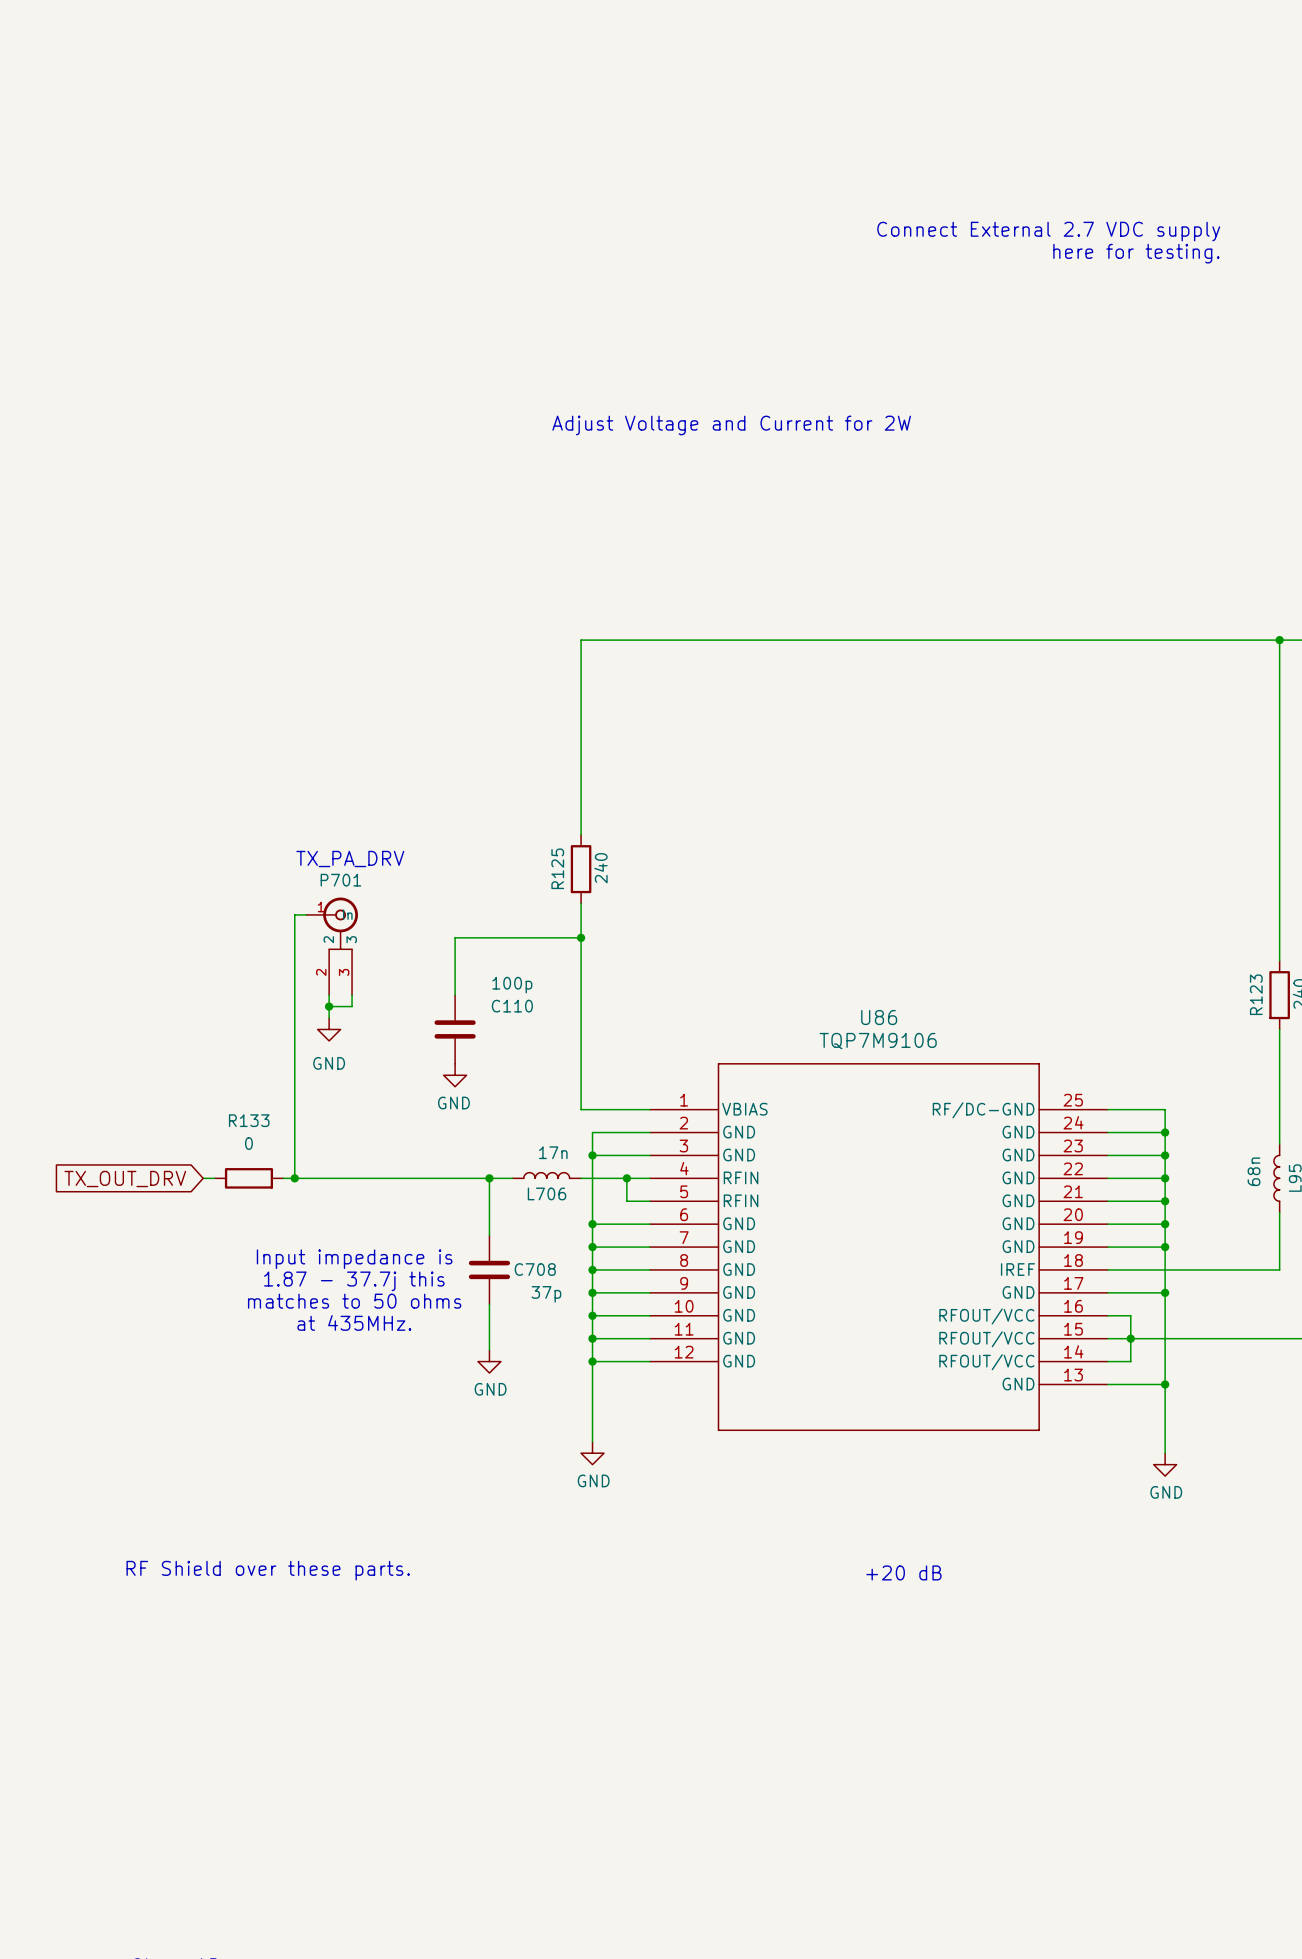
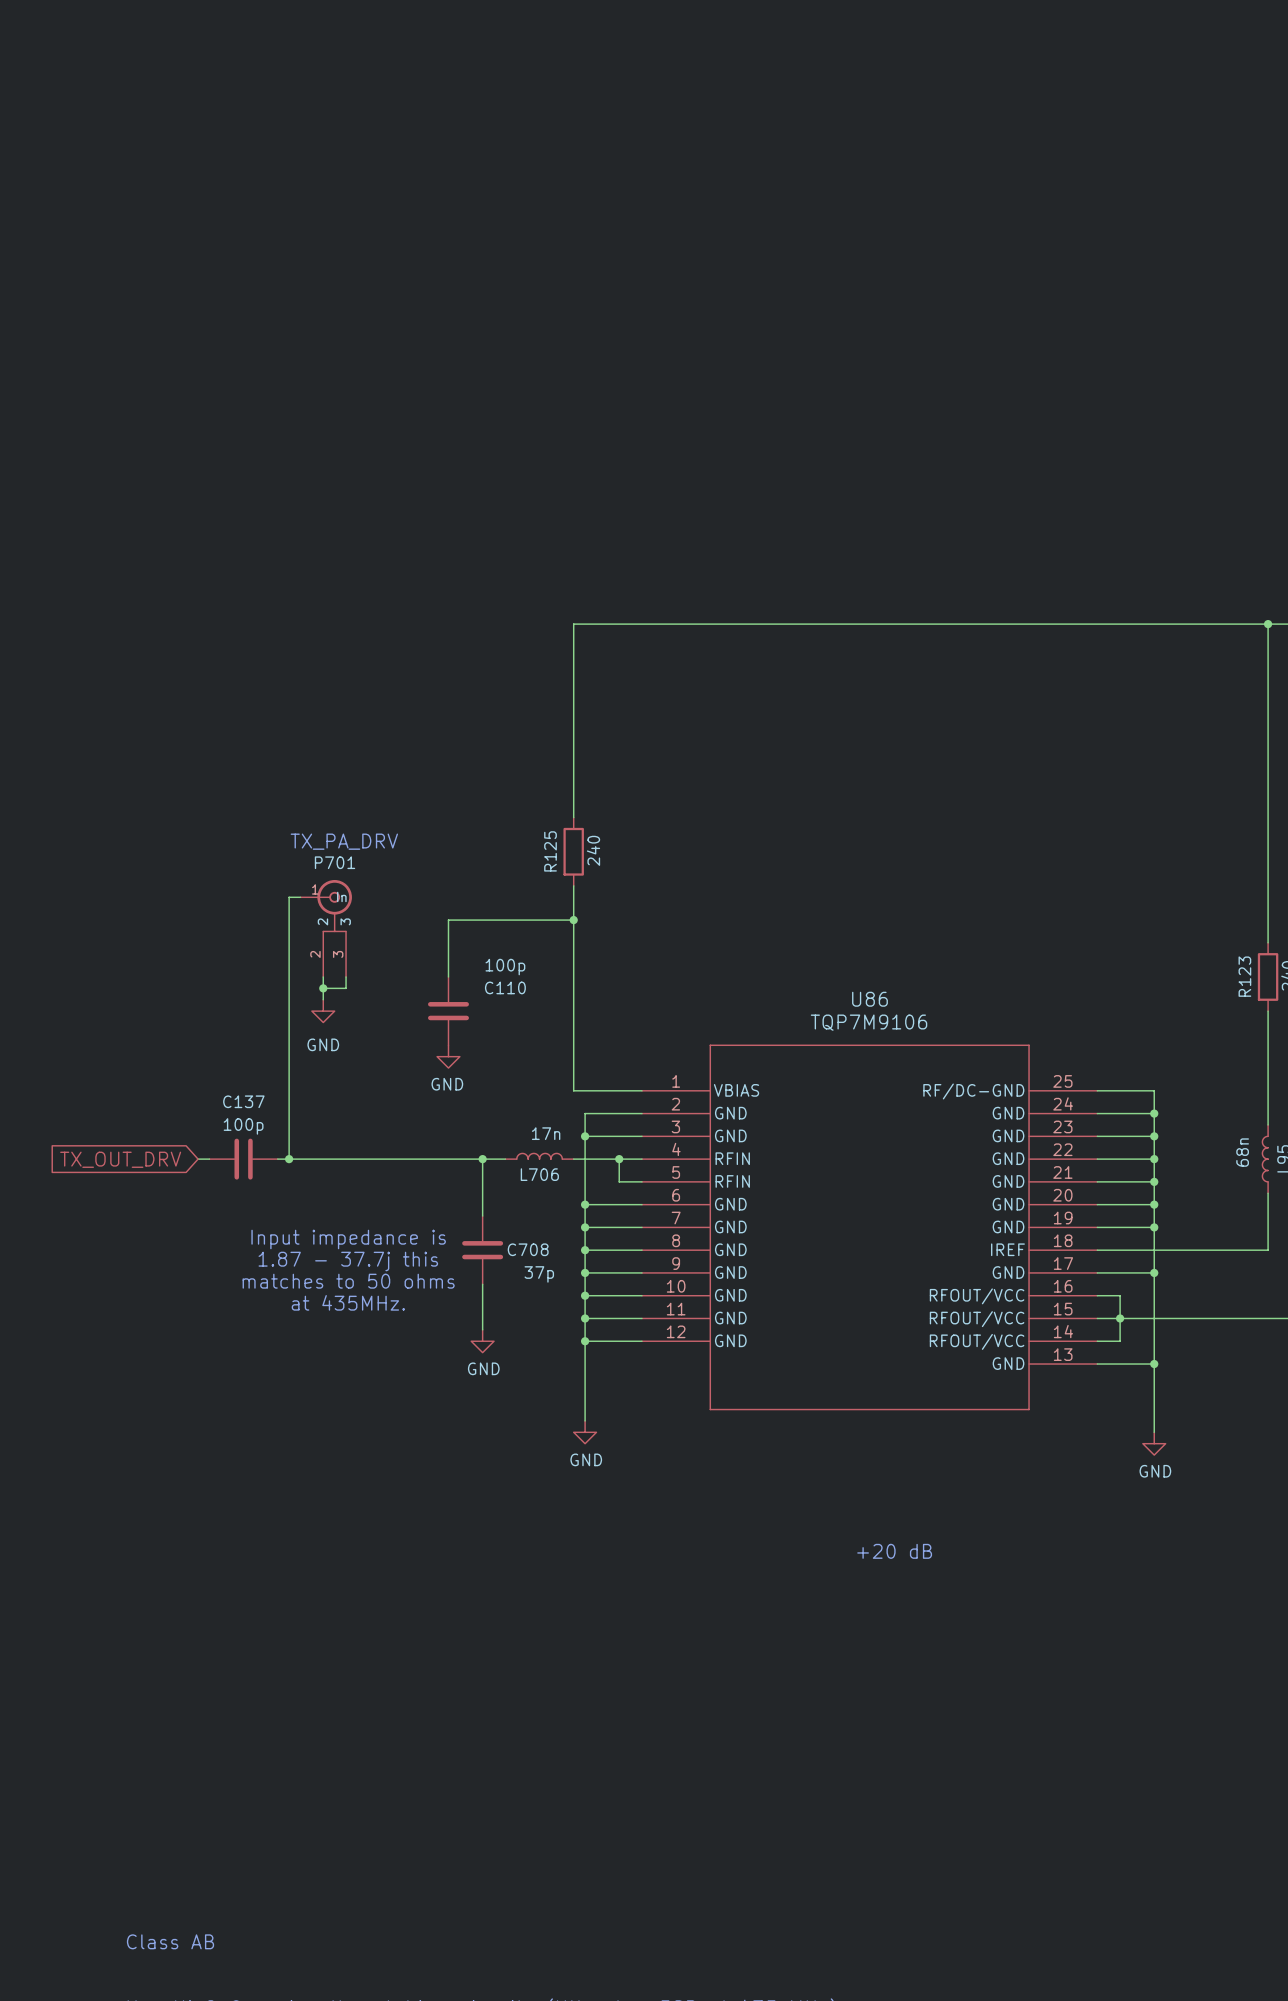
text: Connect External 2.7 VDC supply (1048, 231) -> none
text: here for testing. (1136, 253) -> none
text: Adjust Voltage and Current for 2W (731, 425) -> none
R133: 0 (248, 1178) -> none
C137: none -> 100p (243, 1159)
text: RF Shield over these parts. (268, 1570) -> none

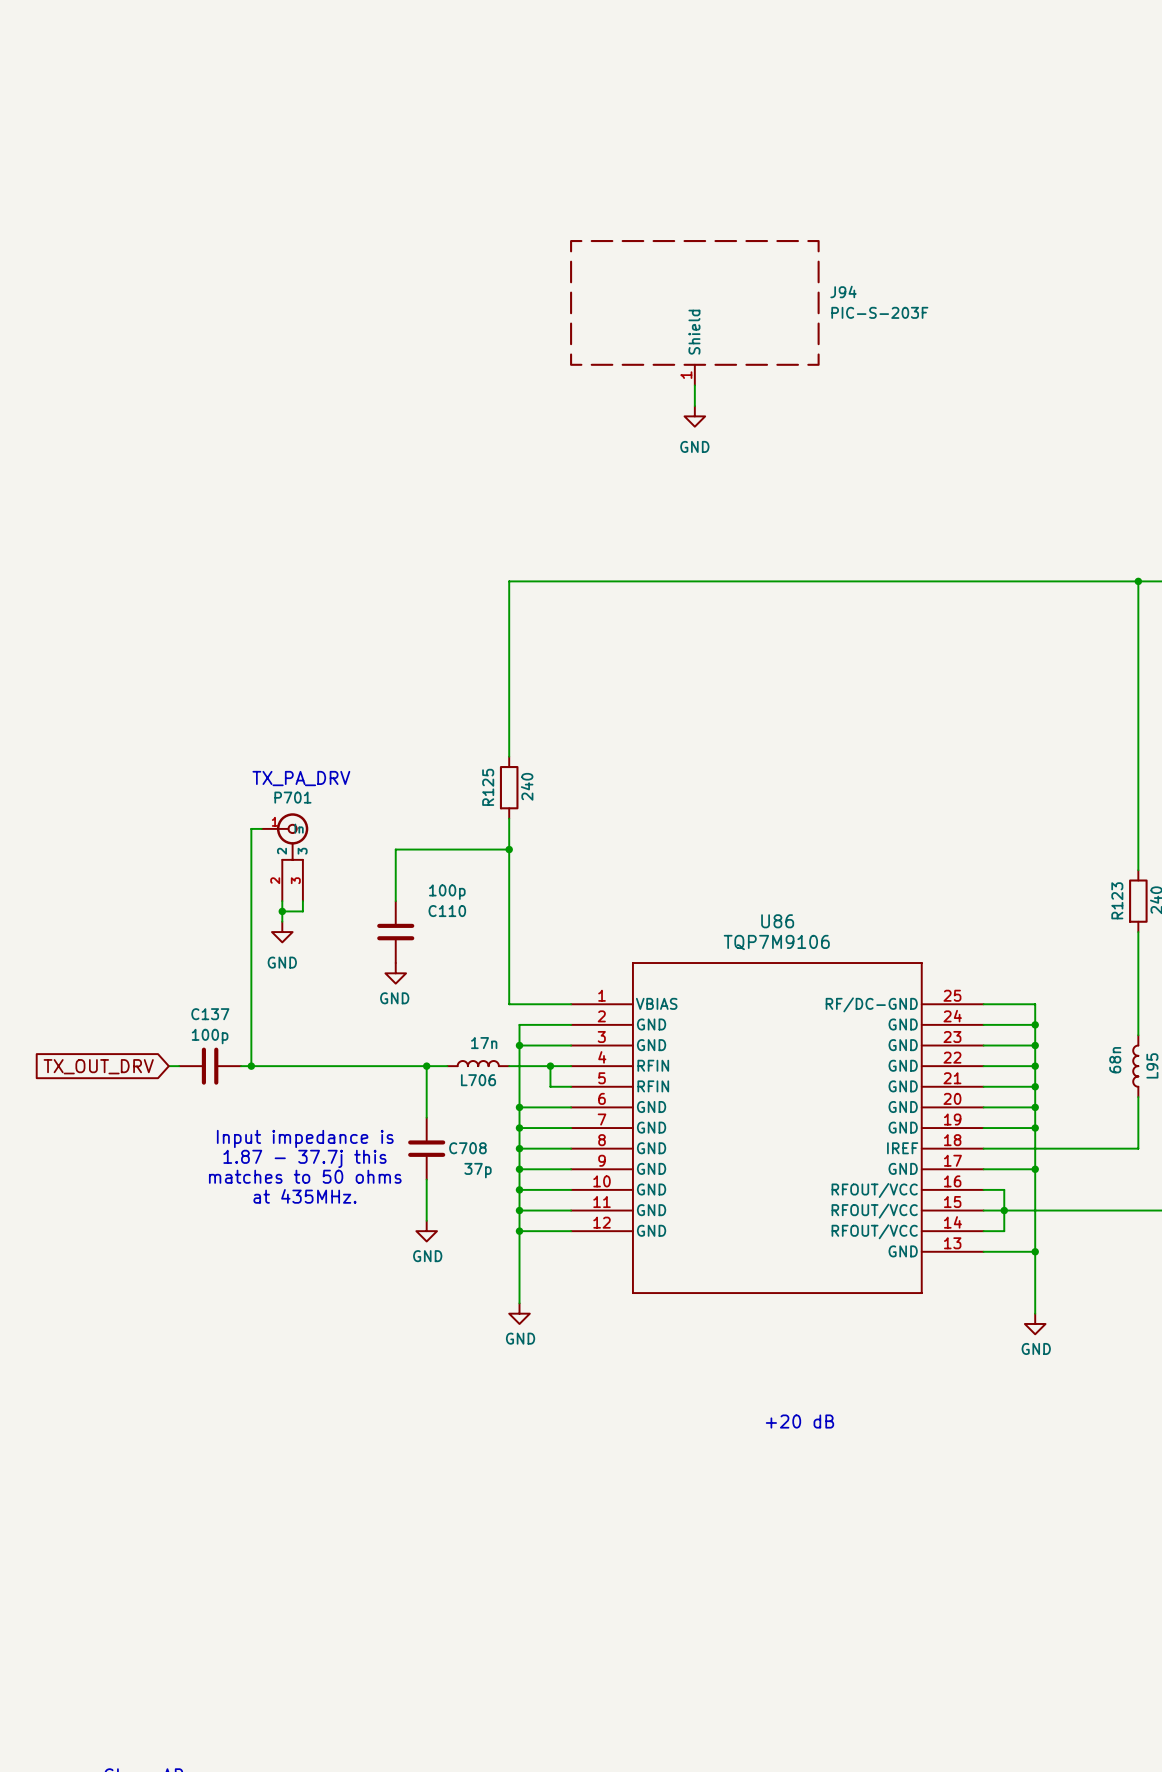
J94: none -> PIC-S-203F (694, 312)
wire: none -> (694, 385) (694, 406)
power symbol: none -> GND (694, 416)

